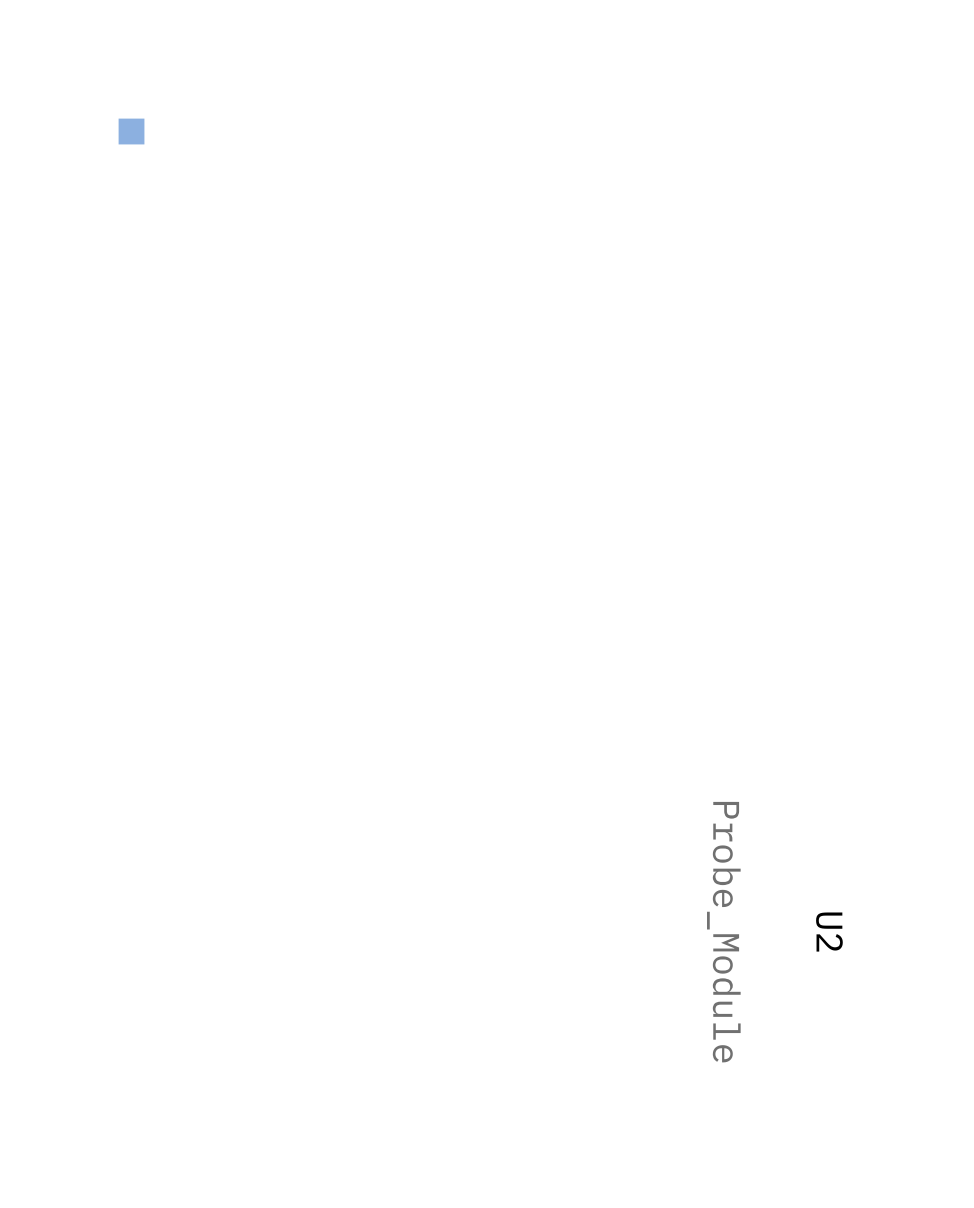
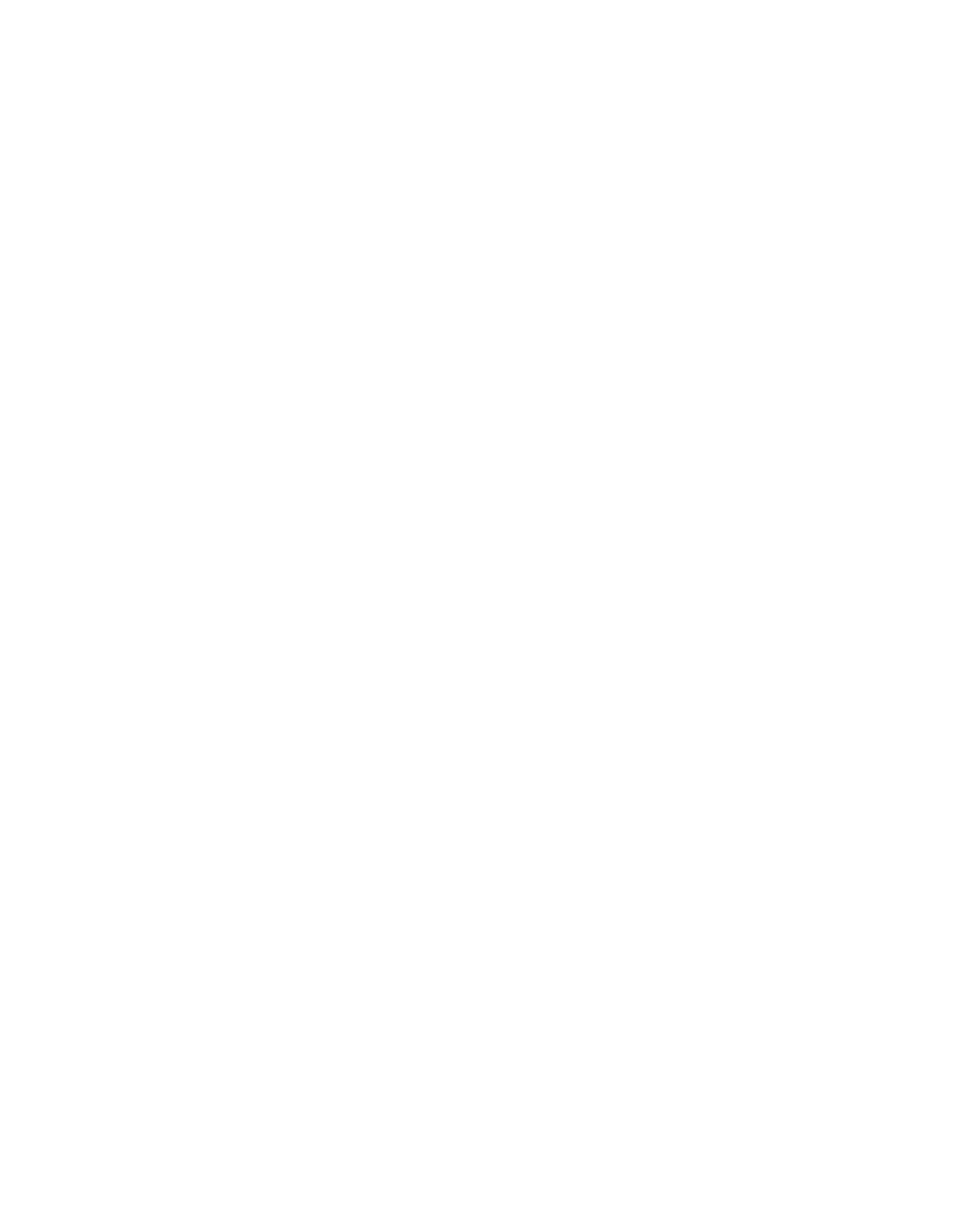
U2: Probe_Module (131, 131) -> none

